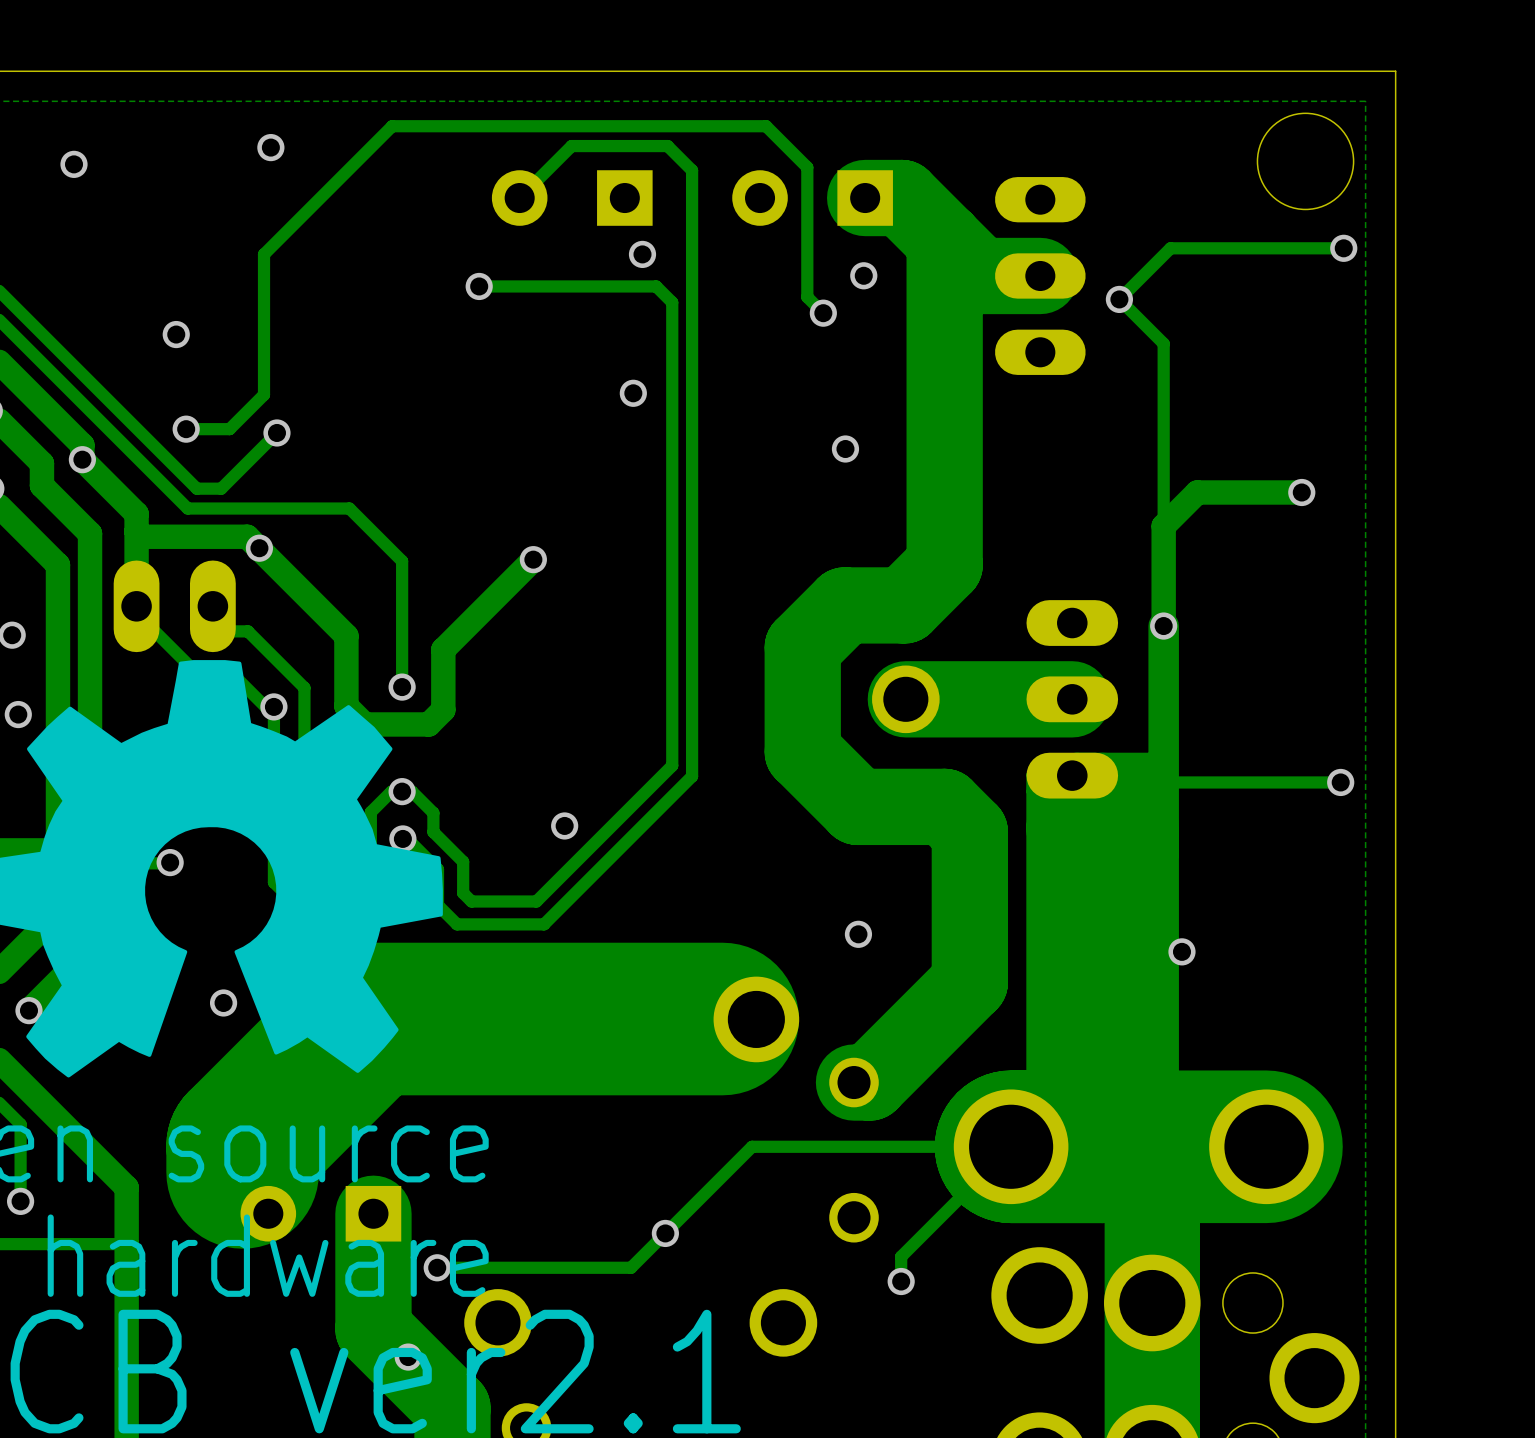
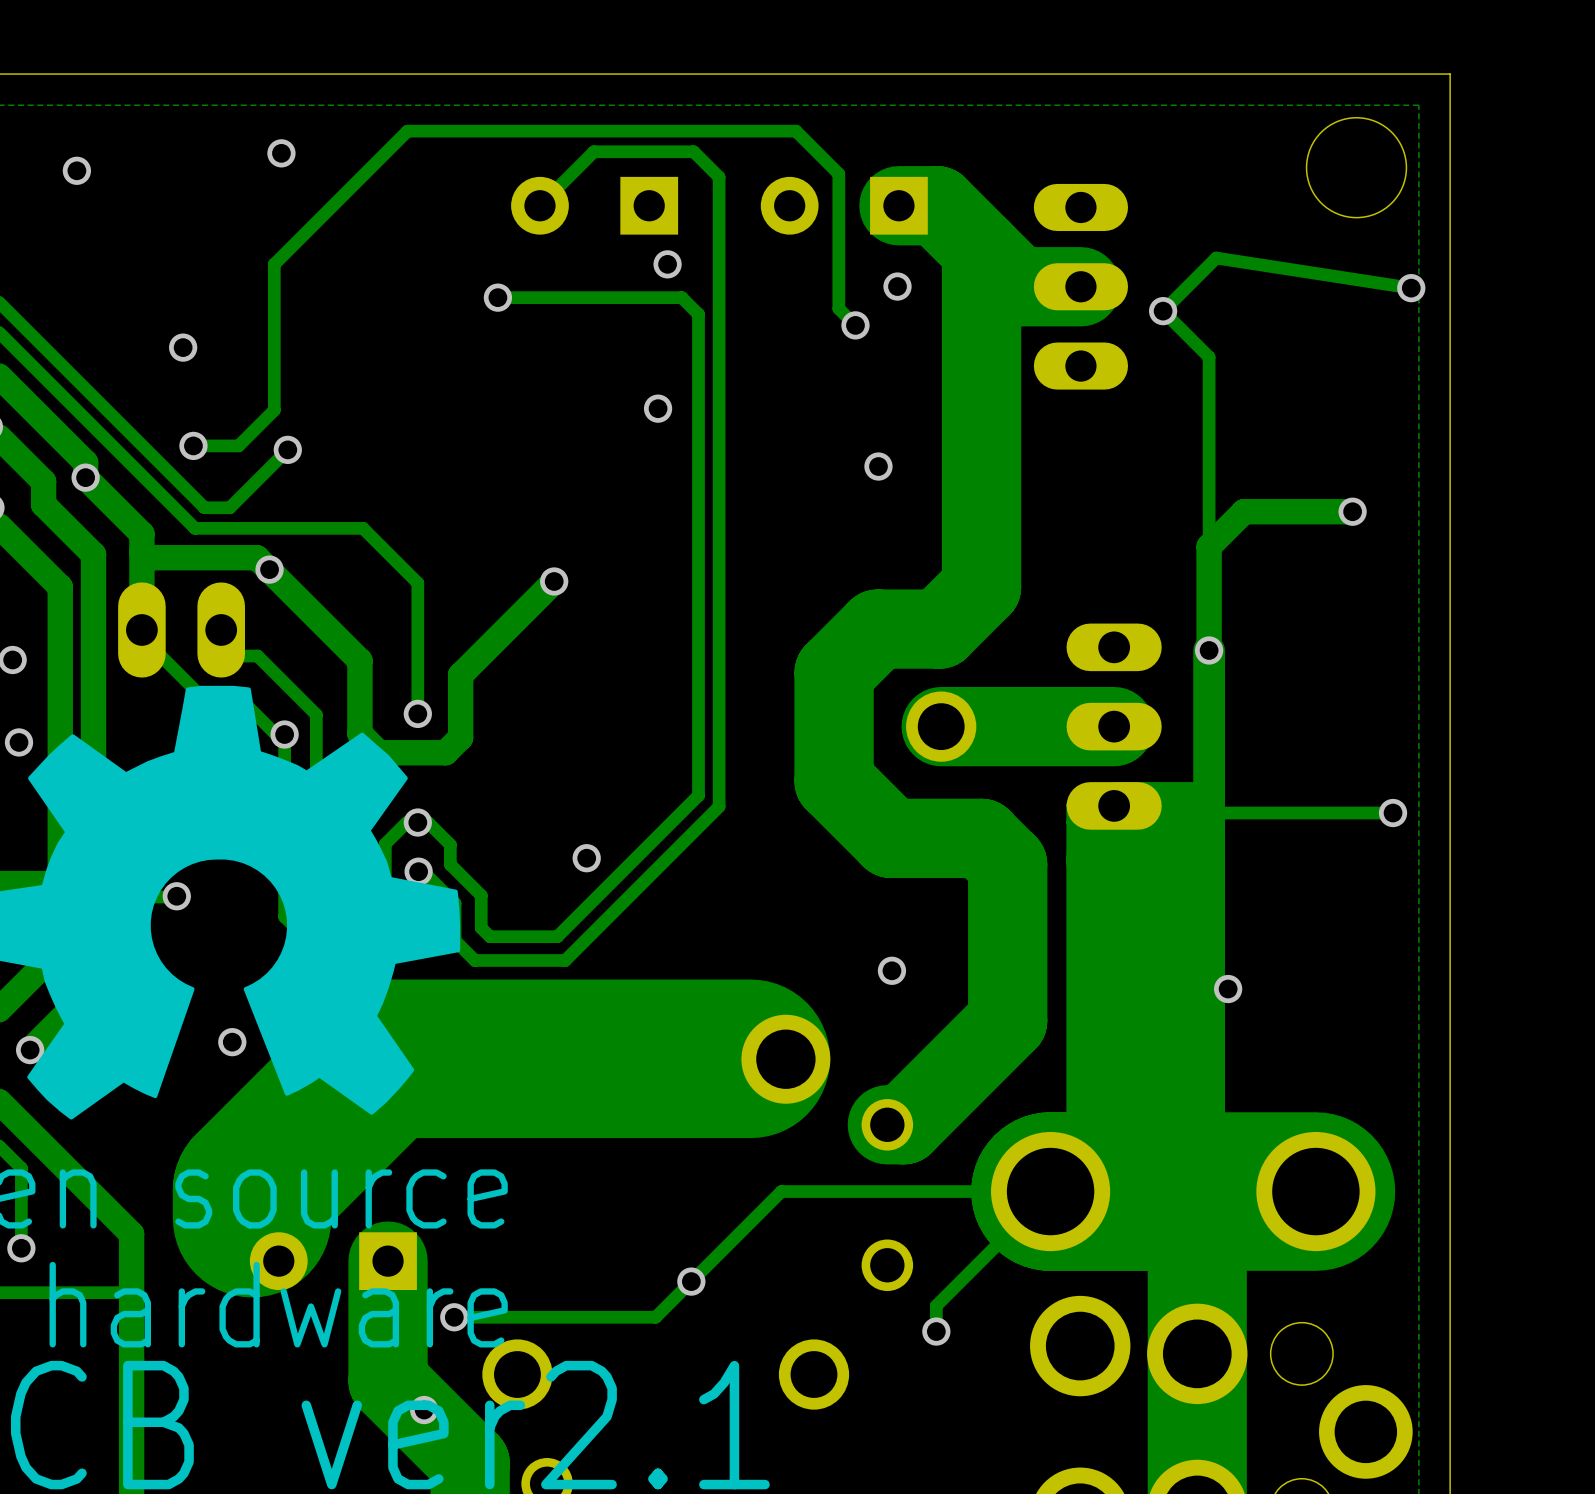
track: (1343, 248) (1170, 248) -> (1411, 288) (1216, 258)
via position: (1343, 248) -> (1411, 288)

